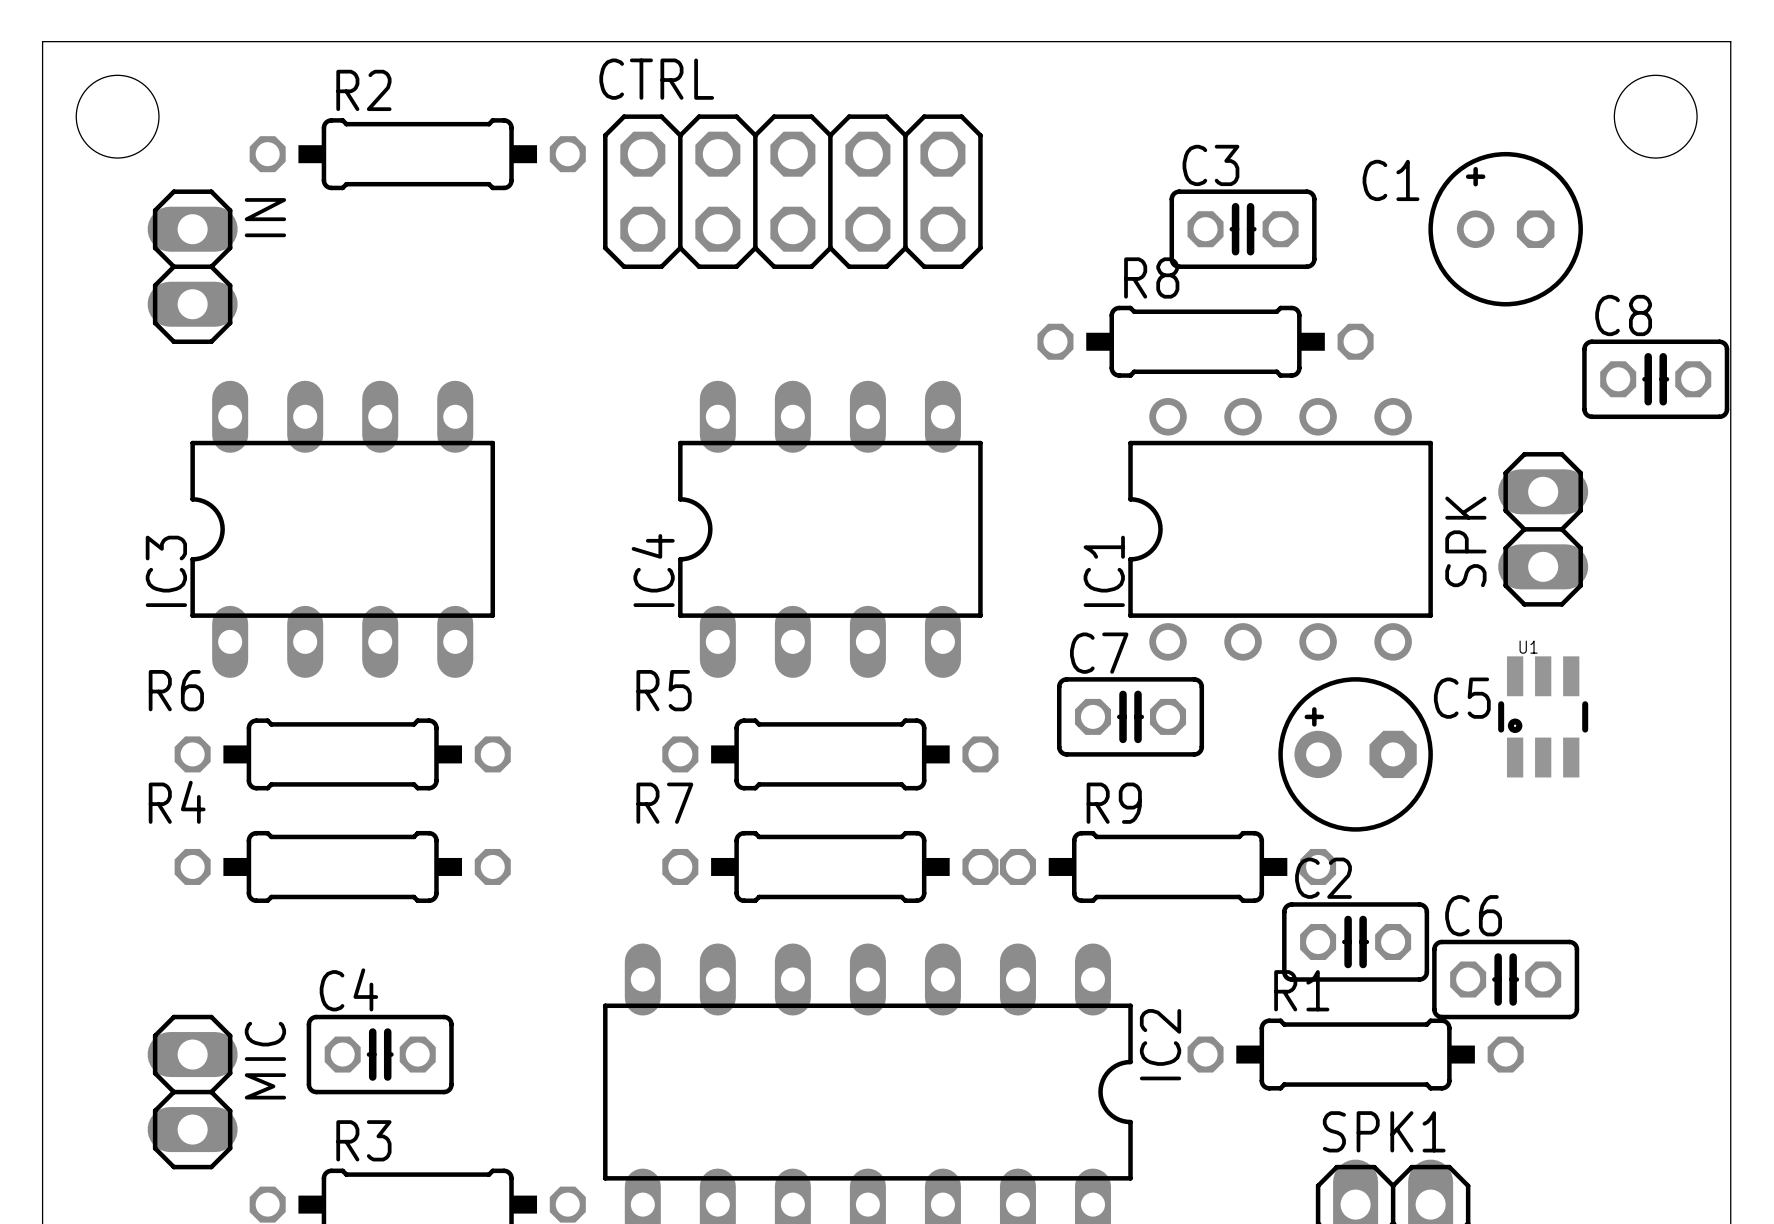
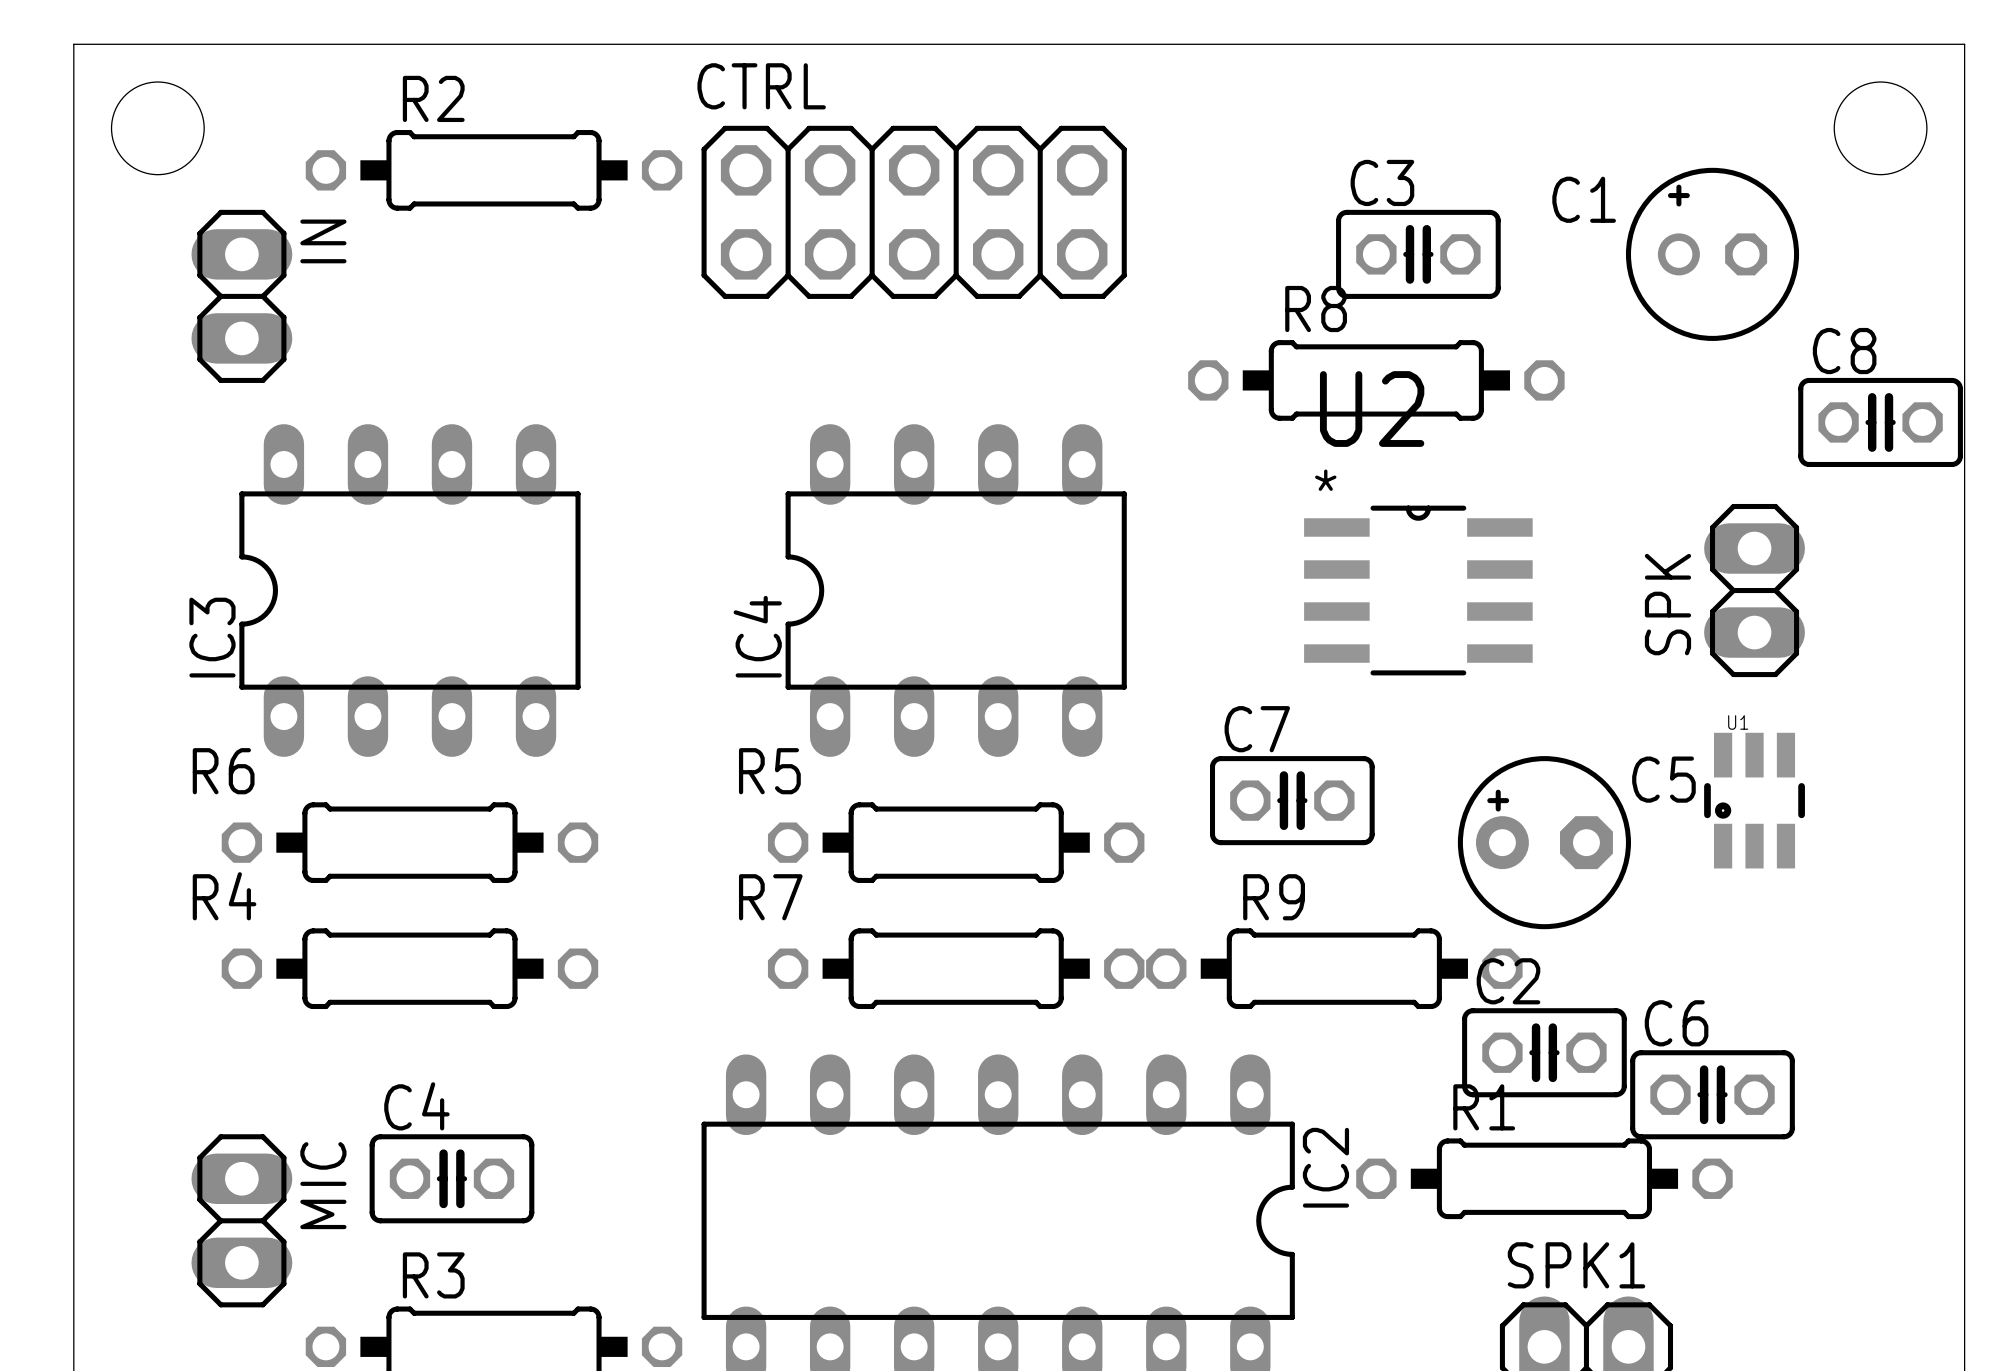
U2: none -> (1418, 590)
IC1: (1280, 529) -> none

